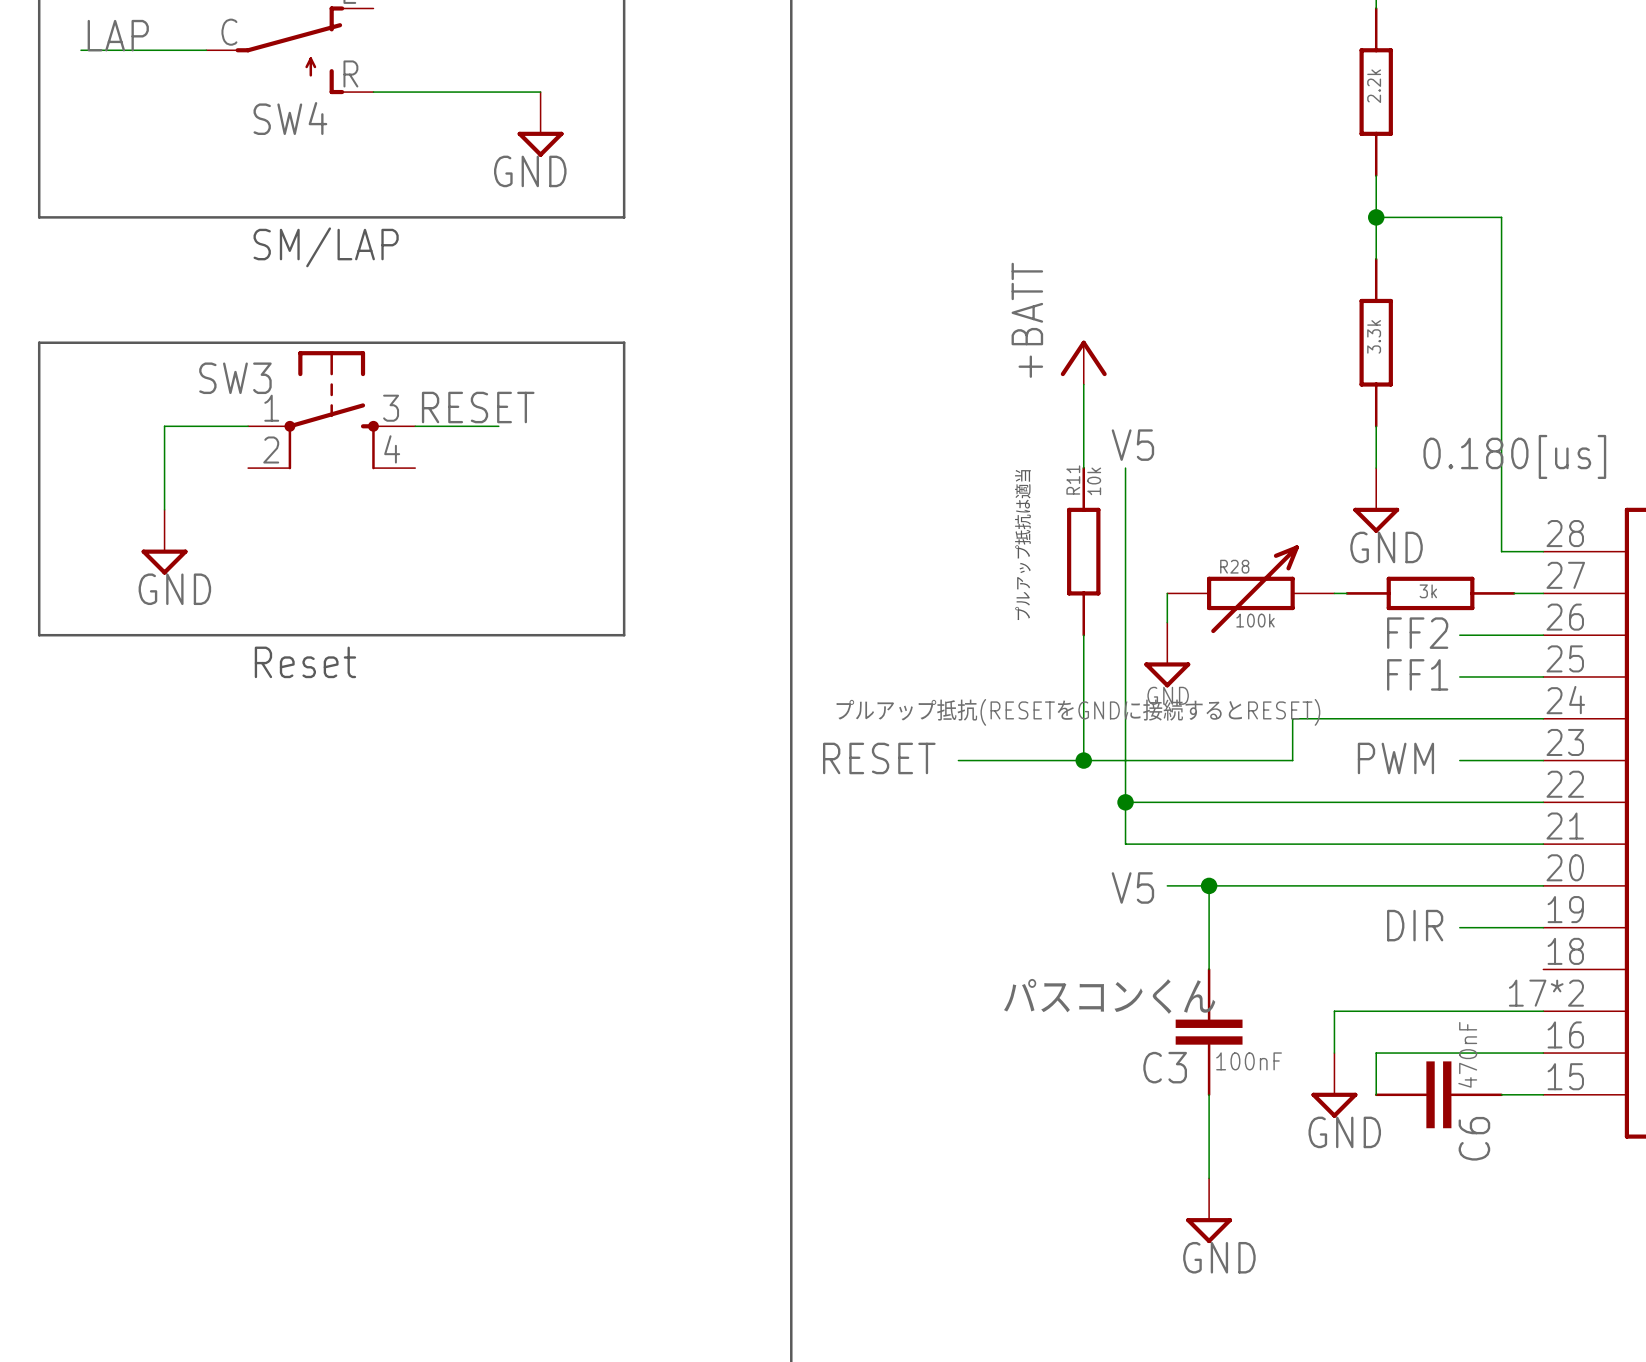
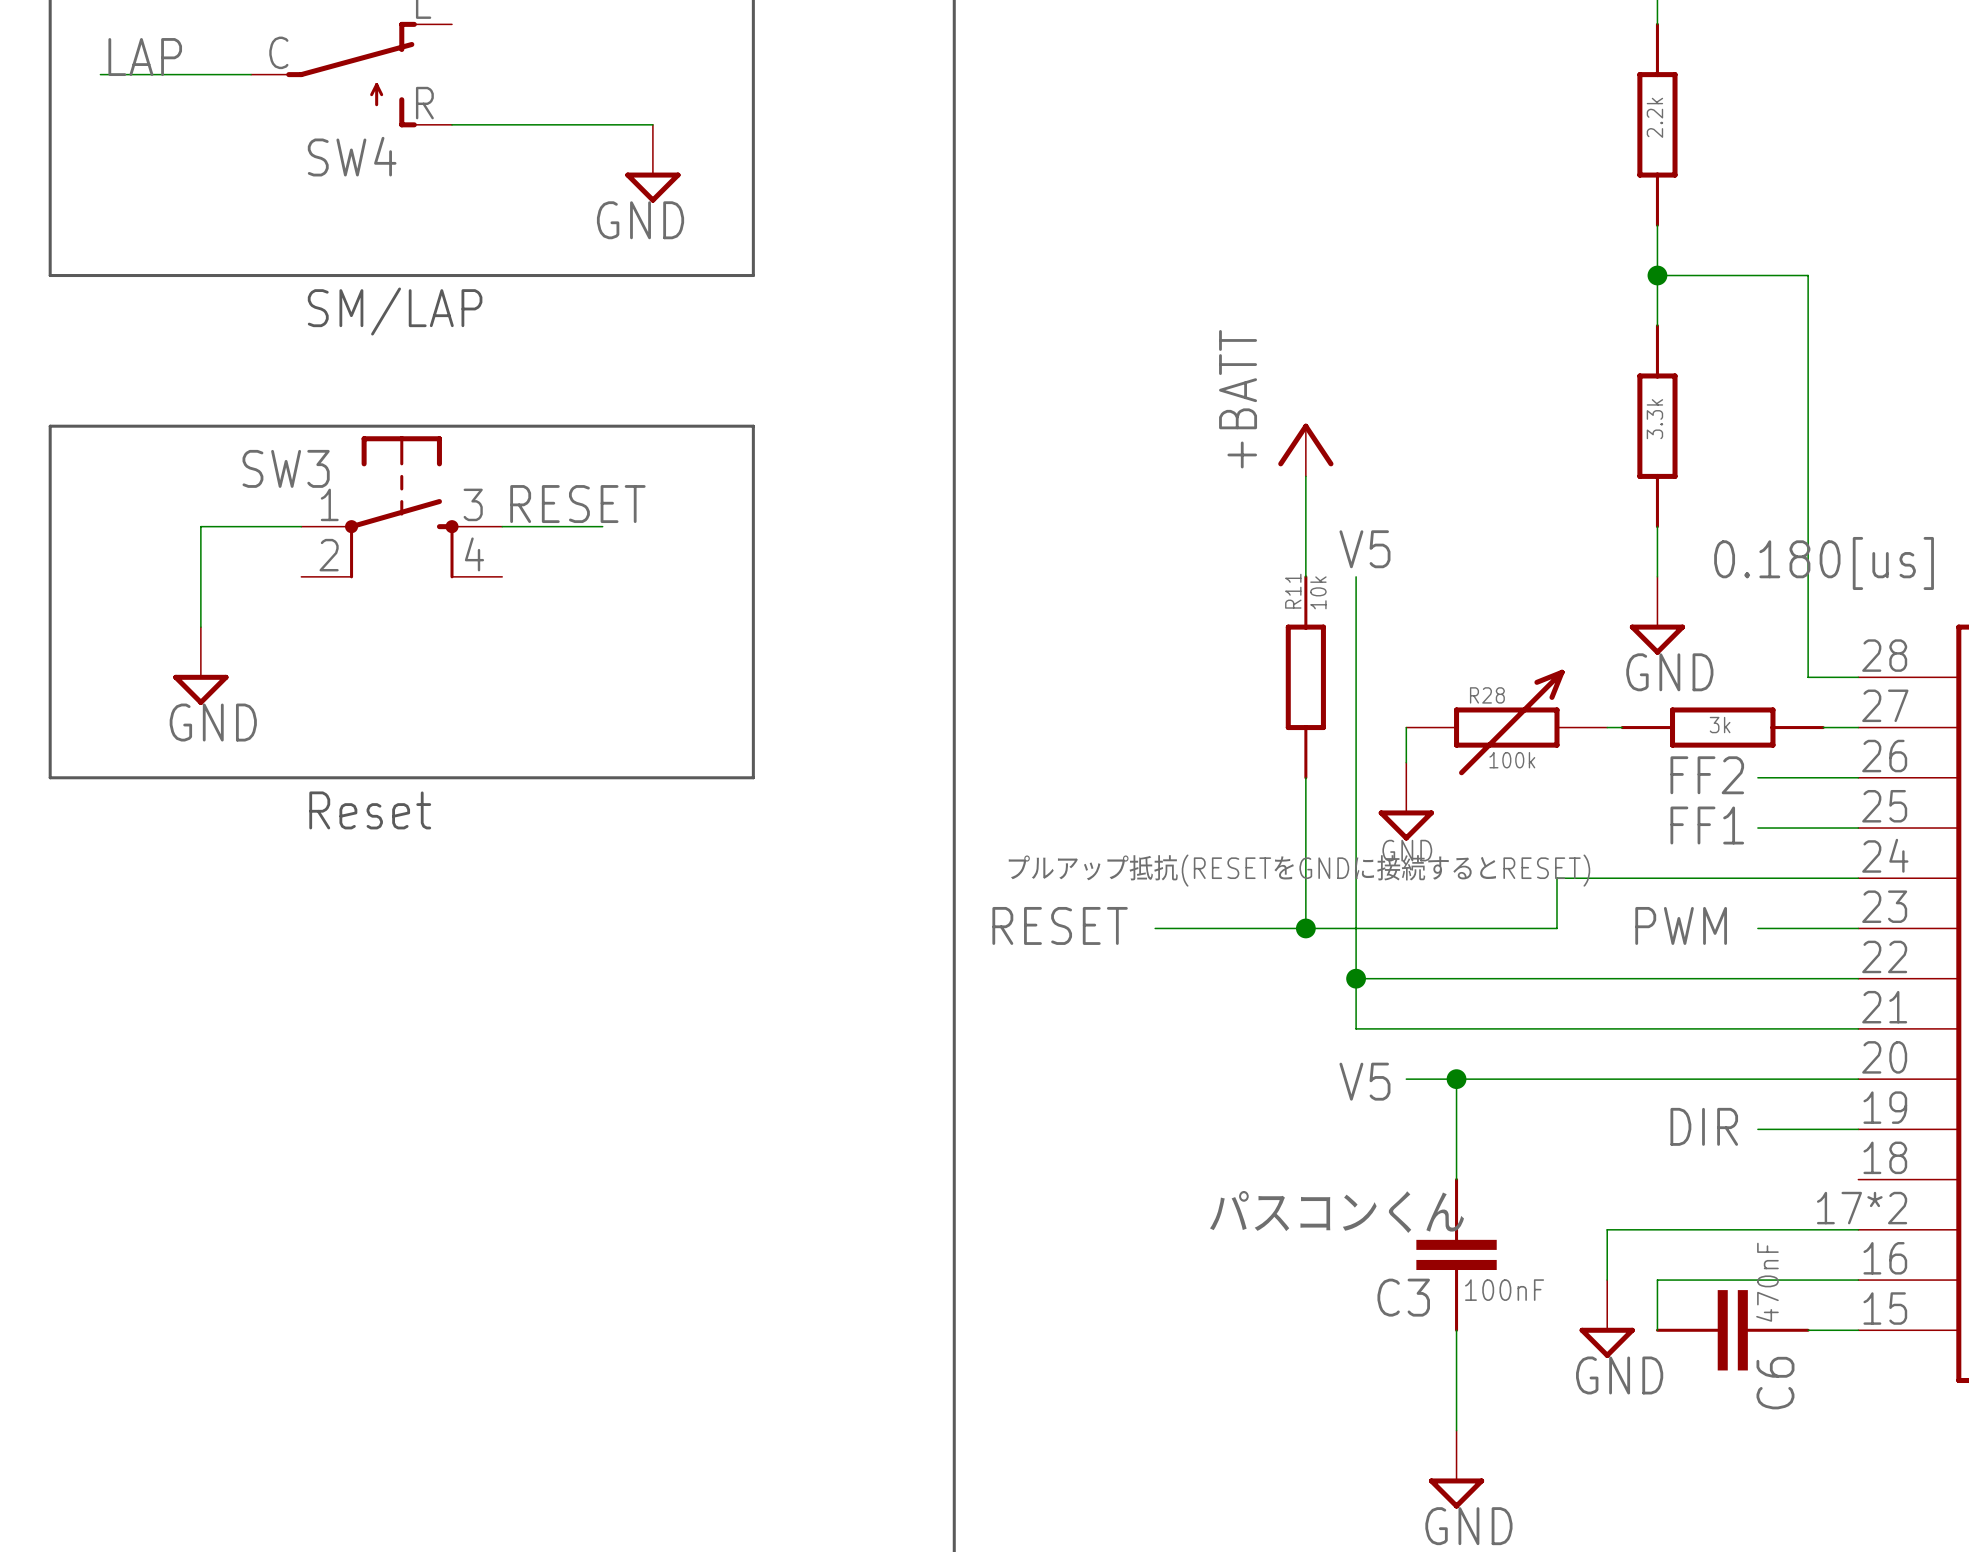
text: プルアップ抵抗は適当 (1022, 544) -> none

